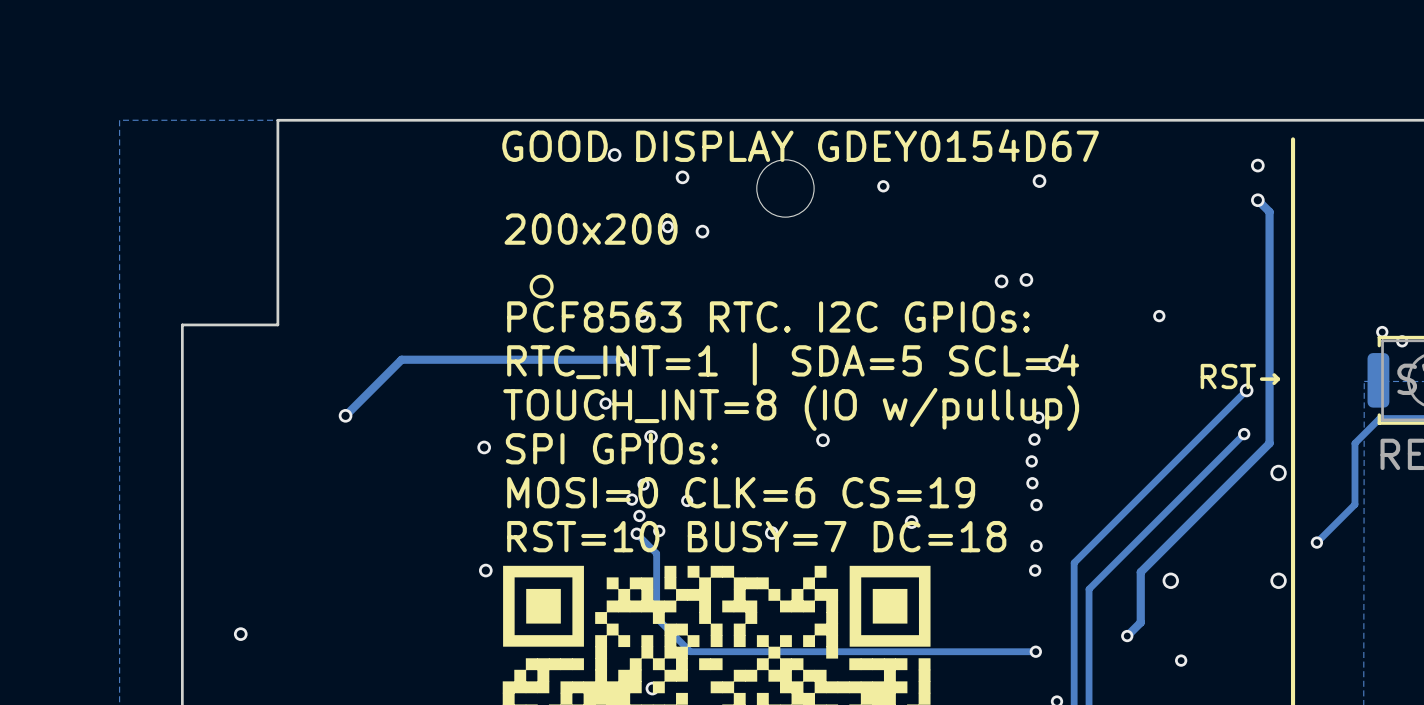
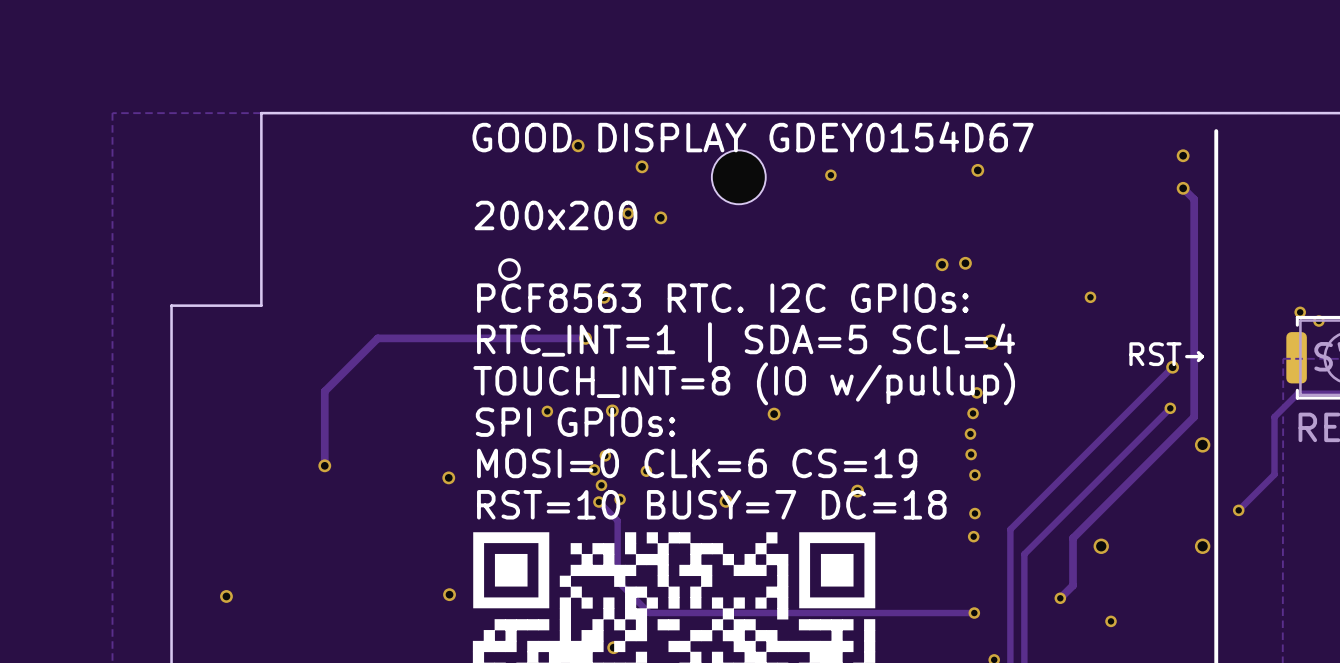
via position: (605, 403) -> (547, 411)
via: (345, 415) -> none
track: none -> (324, 391) (324, 465)
via: (484, 447) -> none
via: none -> (324, 465)
via: none -> (448, 477)
via: (485, 570) -> none
via: none -> (449, 594)

